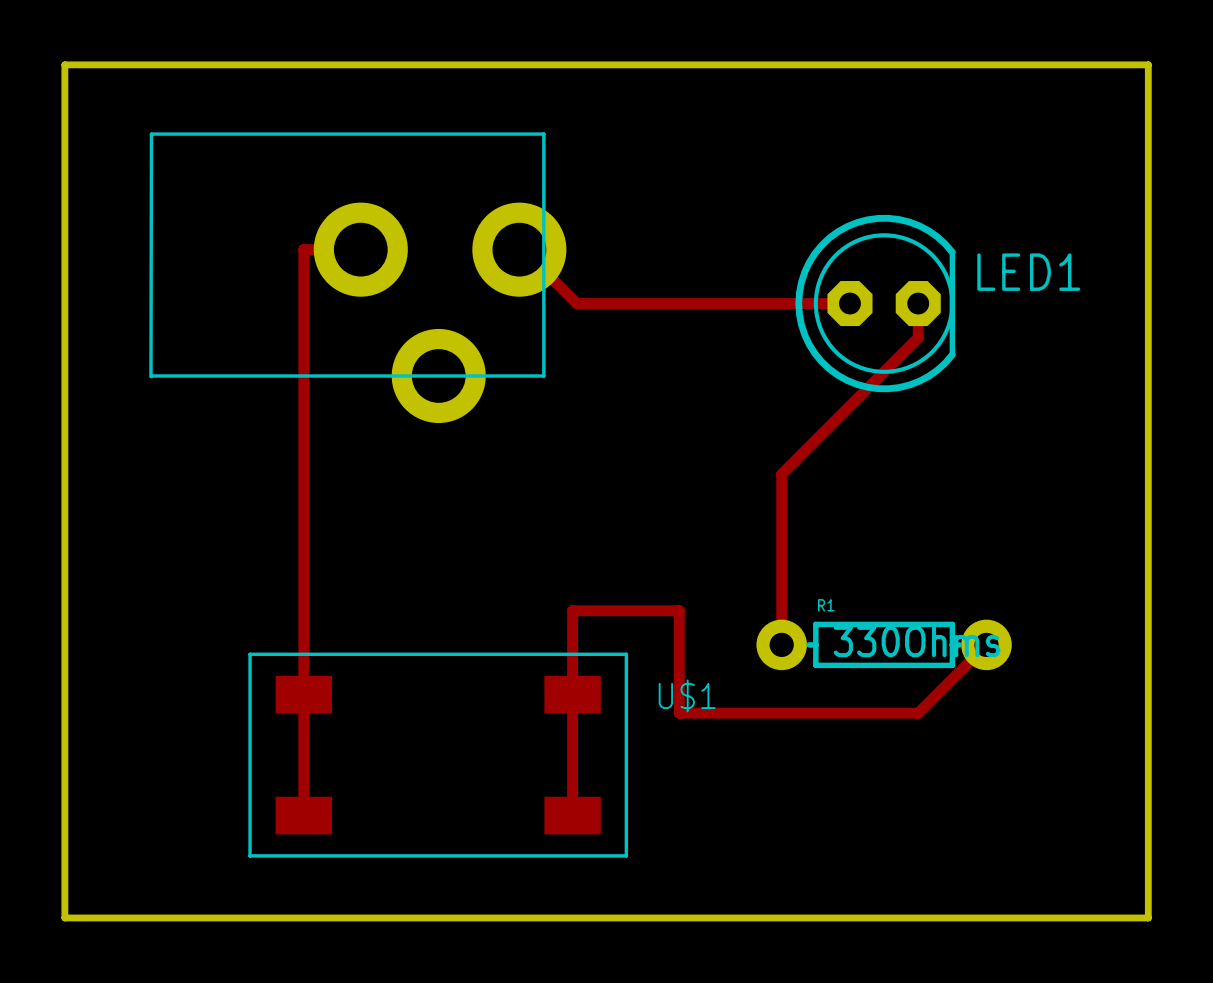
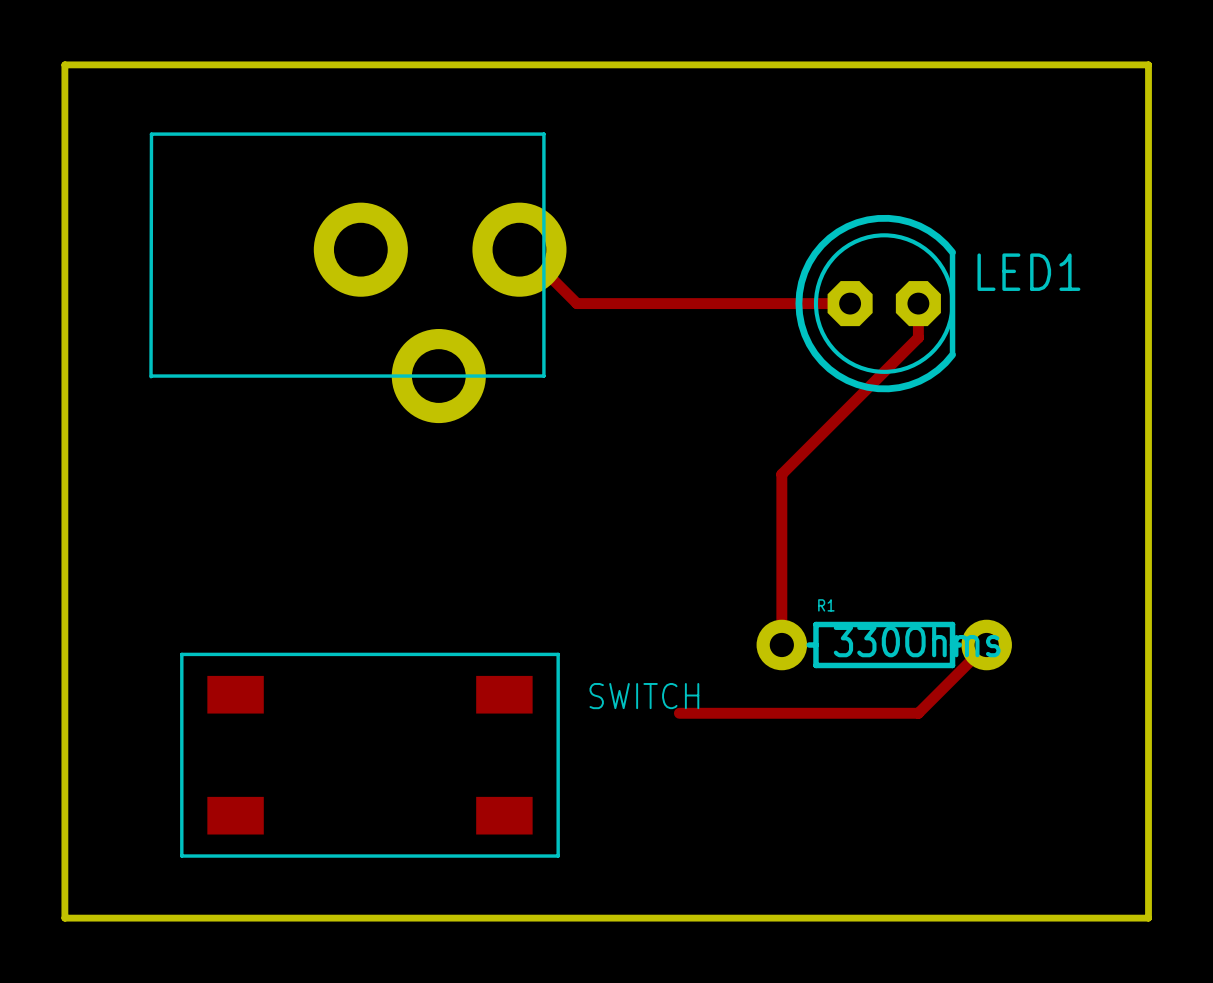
track: (360, 249) (303, 249) (303, 815) -> none
track: (679, 713) (679, 610) (572, 610) (572, 815) -> none
SWITCH: none -> (369, 755)
U$1: (438, 755) -> none

